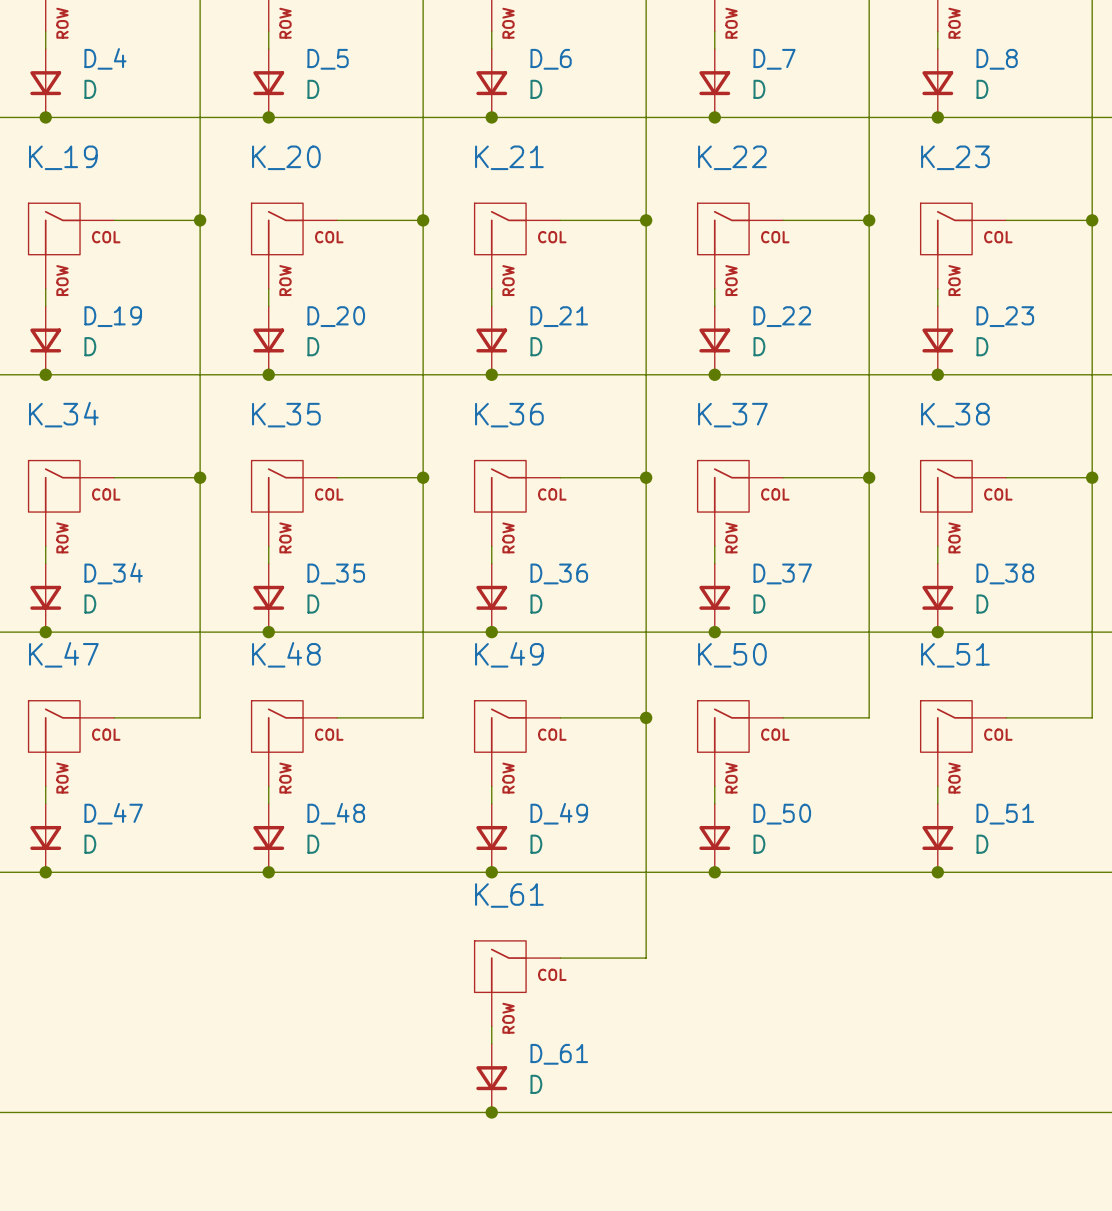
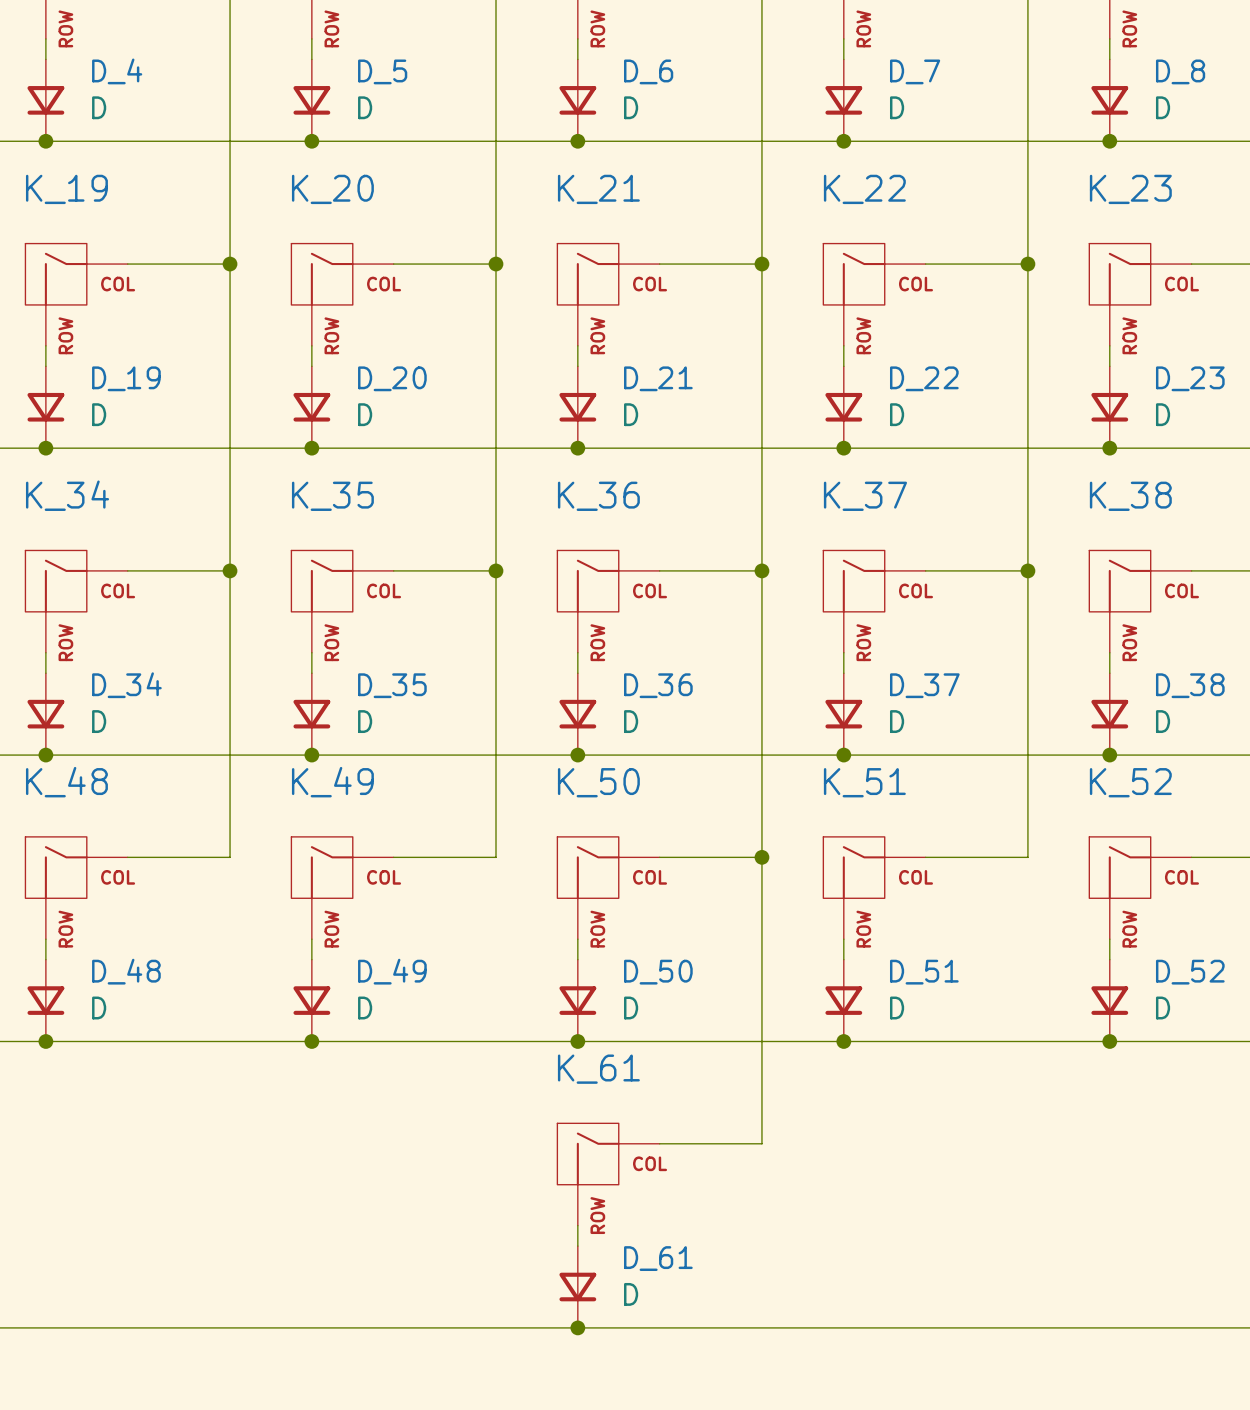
K_47 name: K_47 (63, 654) -> K_48 (66, 782)
K_48 name: K_48 (286, 654) -> K_49 (332, 782)
K_49 name: K_49 (509, 654) -> K_50 (598, 782)
K_50 name: K_50 (732, 655) -> K_51 (864, 782)
K_51 name: K_51 (955, 655) -> K_52 (1130, 782)
D_47 name: D_47 (113, 813) -> D_48 (126, 971)
D_48 name: D_48 (336, 813) -> D_49 (392, 971)
D_49 name: D_49 (559, 813) -> D_50 (658, 972)
D_50 name: D_50 (782, 814) -> D_51 (924, 972)
D_51 name: D_51 (1005, 814) -> D_52 (1190, 972)

